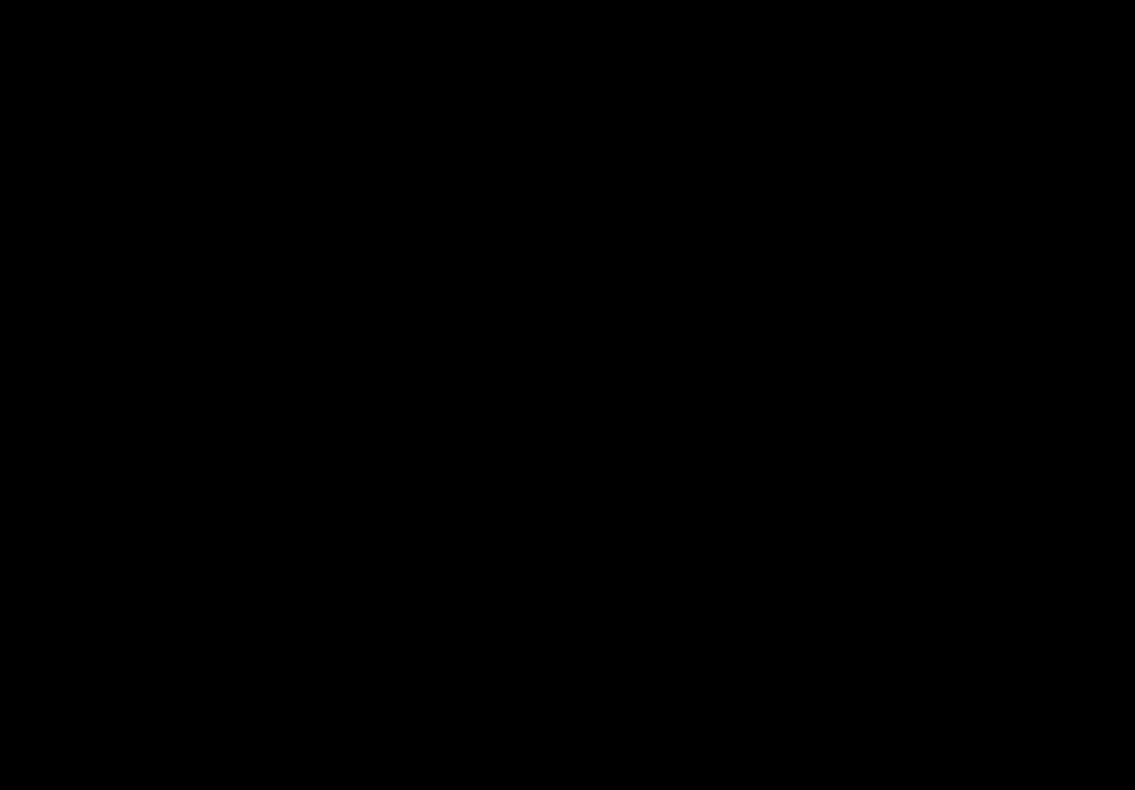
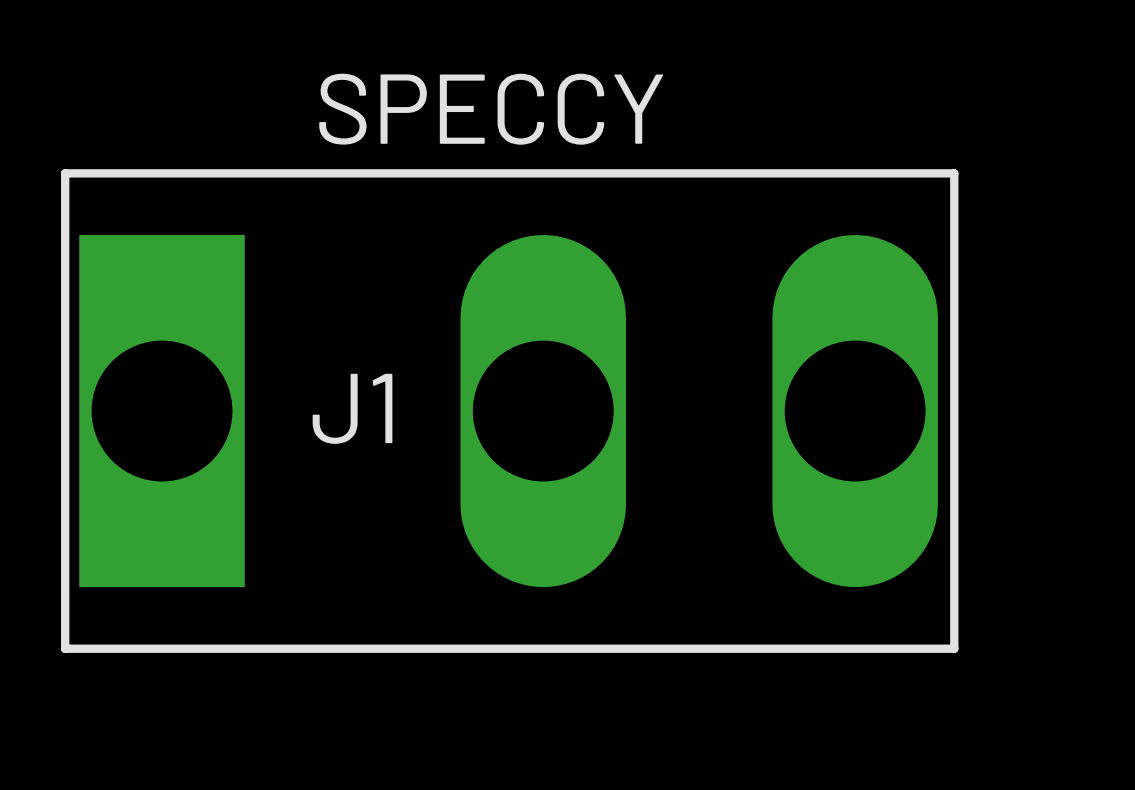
text: none -> SPECCY (491, 109)
J1: none -> (509, 411)

